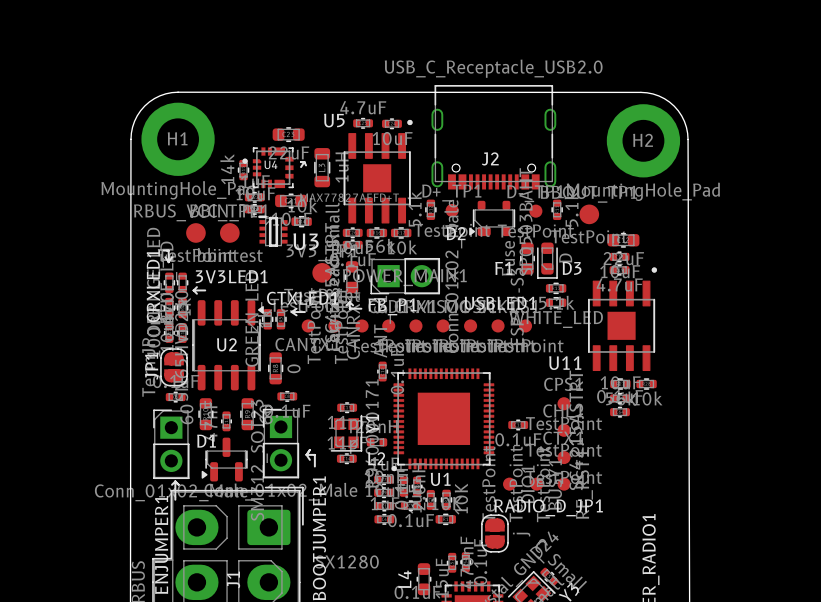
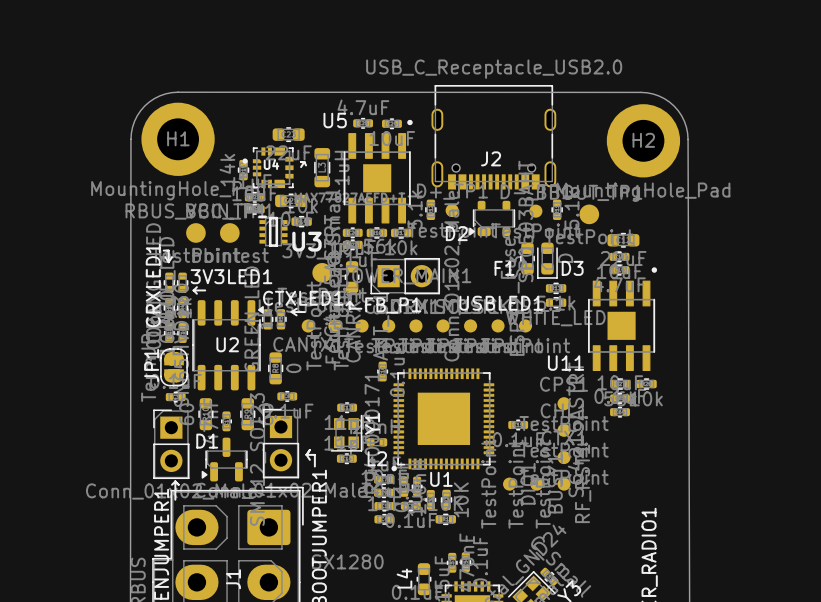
RADIO_D_JP1: j (494, 533) -> none

